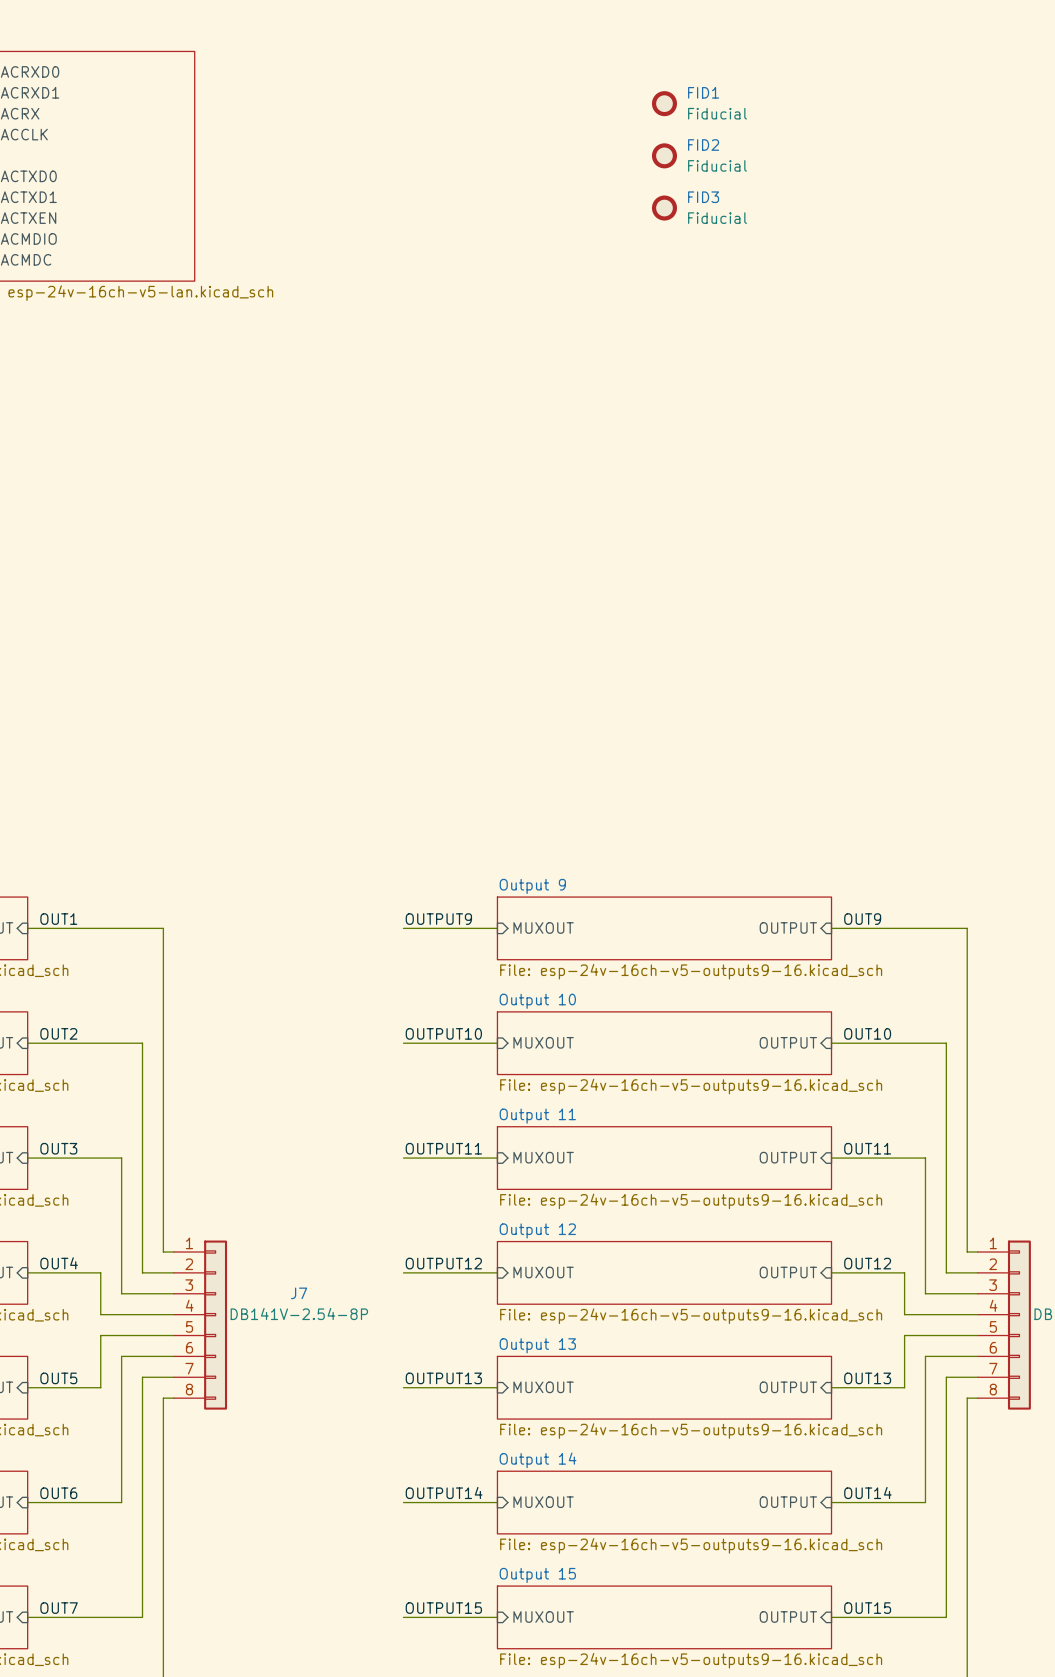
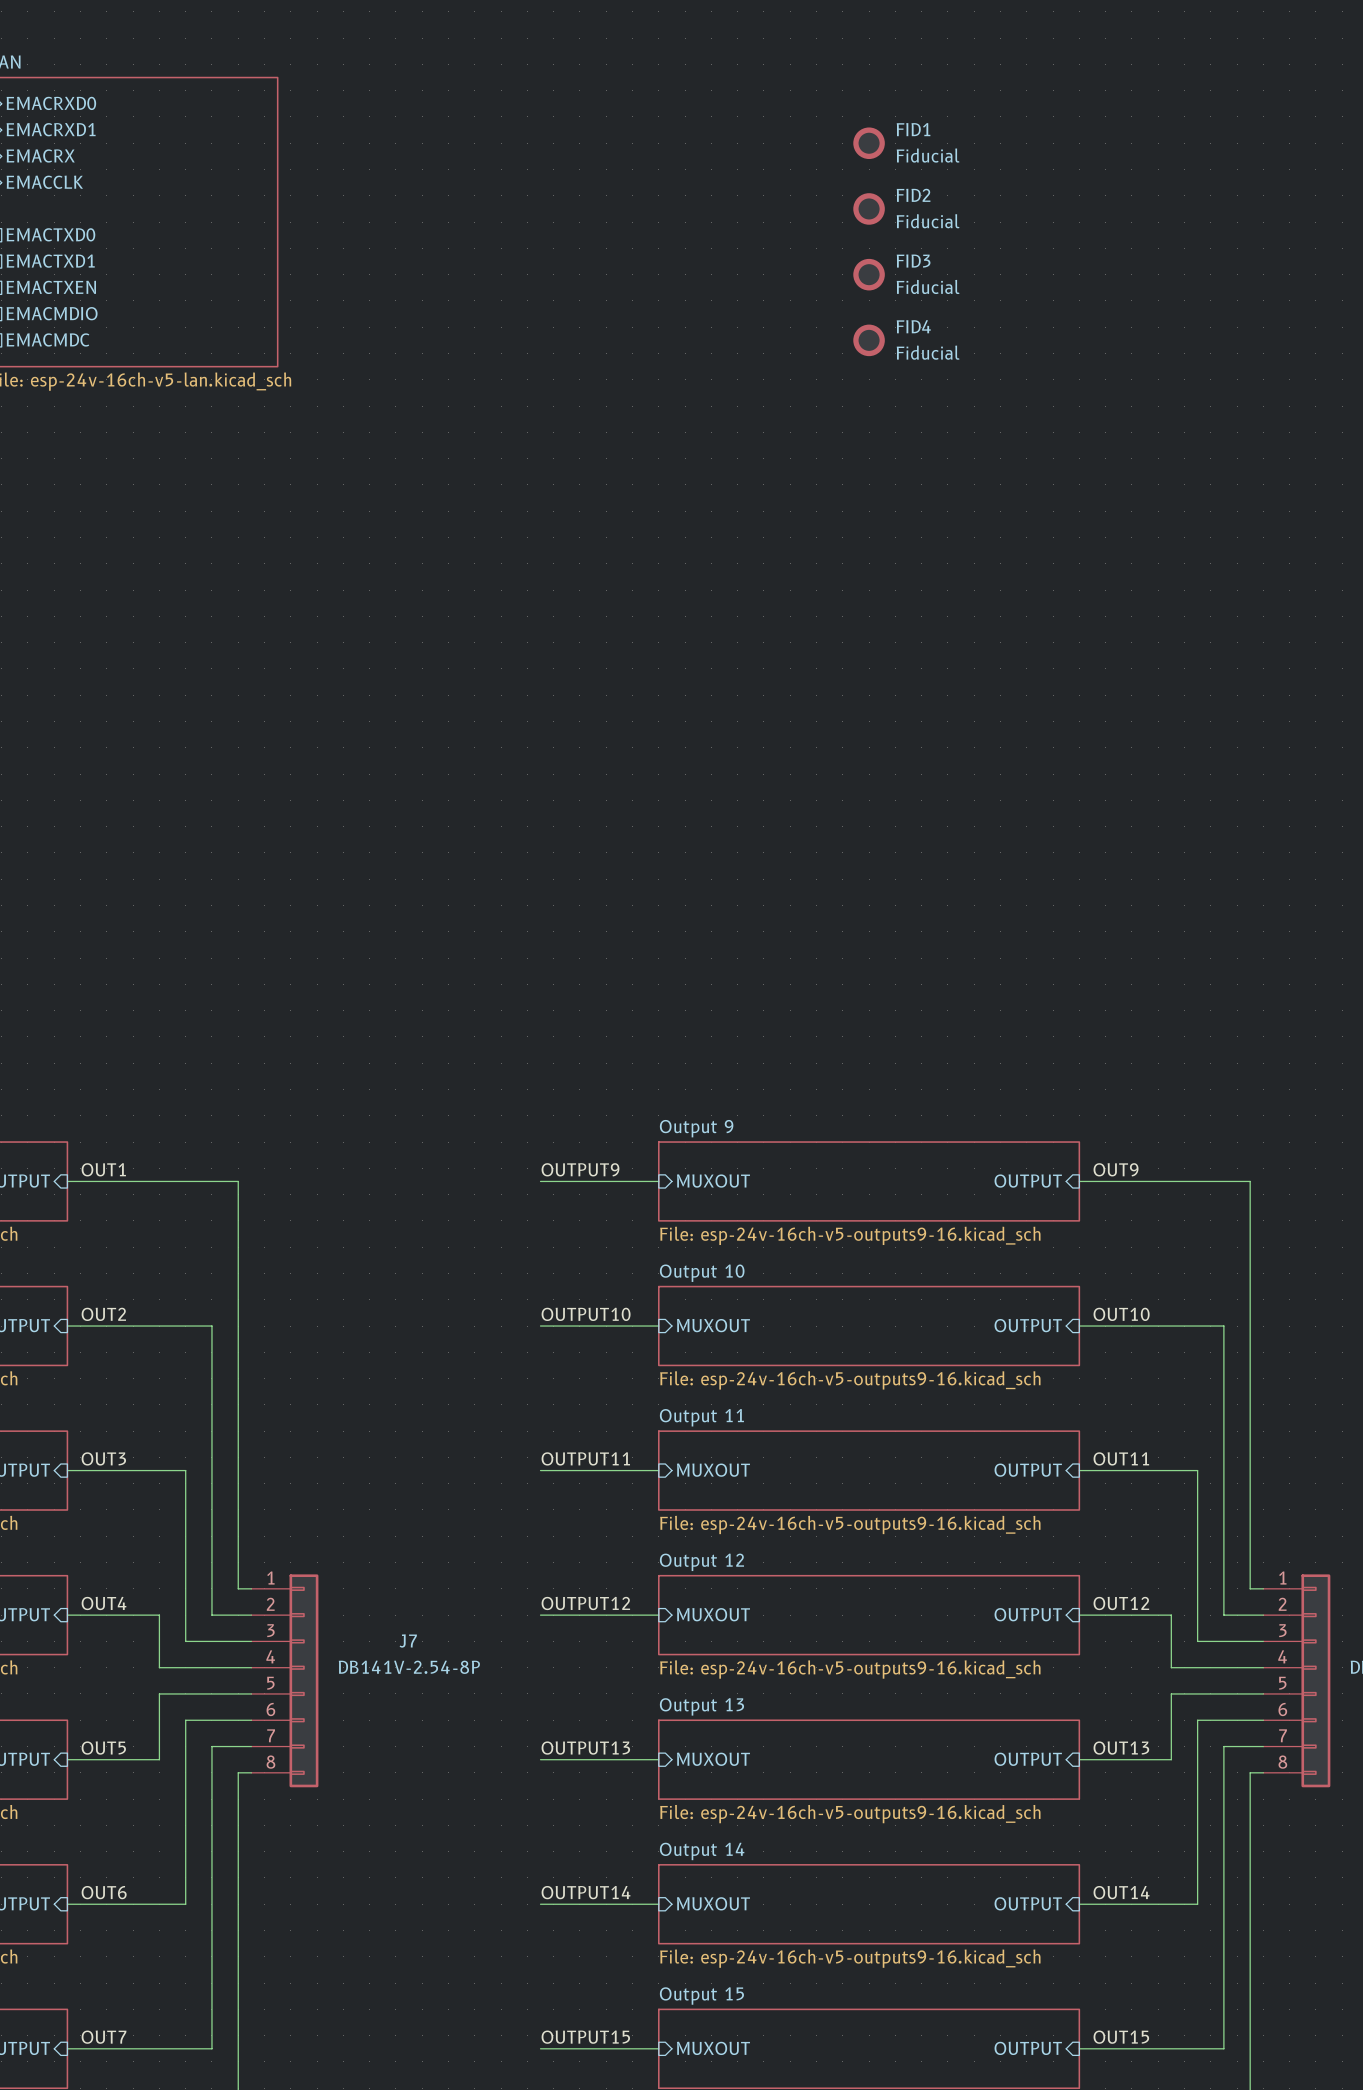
FID4: none -> Fiducial (869, 340)

